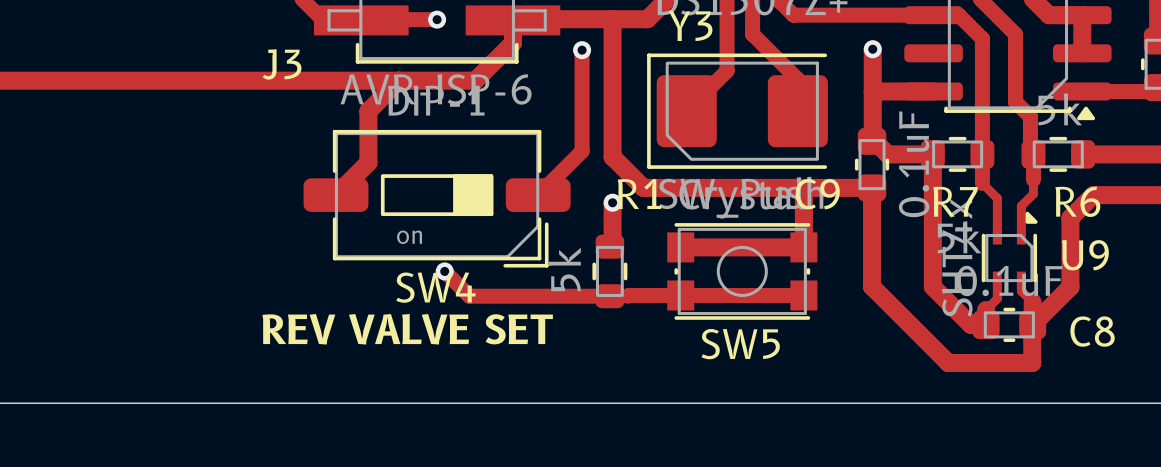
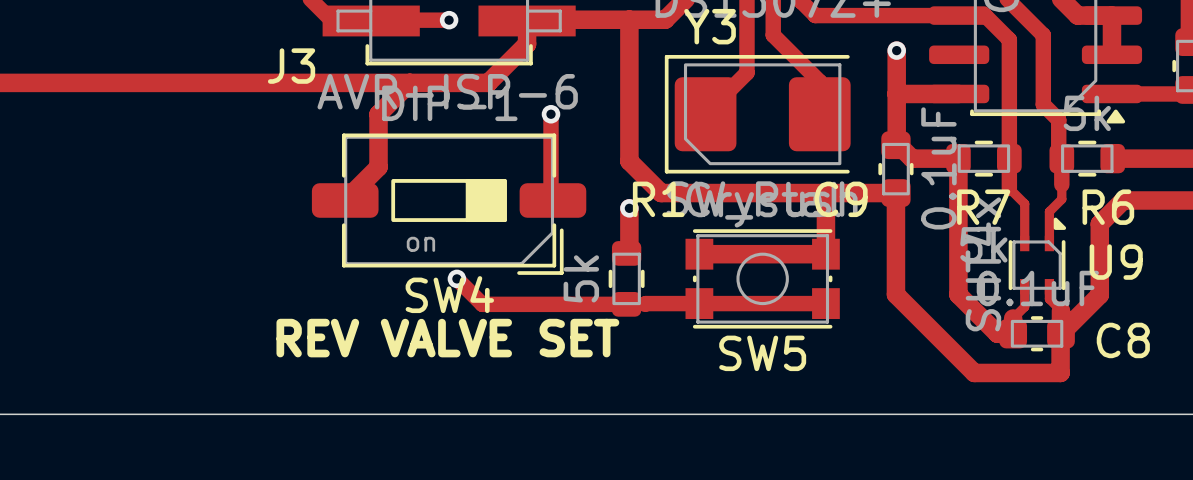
track: (582, 50) (582, 151) (538, 195) -> (551, 114) (551, 198) (552, 200)
via: (582, 50) -> none
via: none -> (551, 114)

